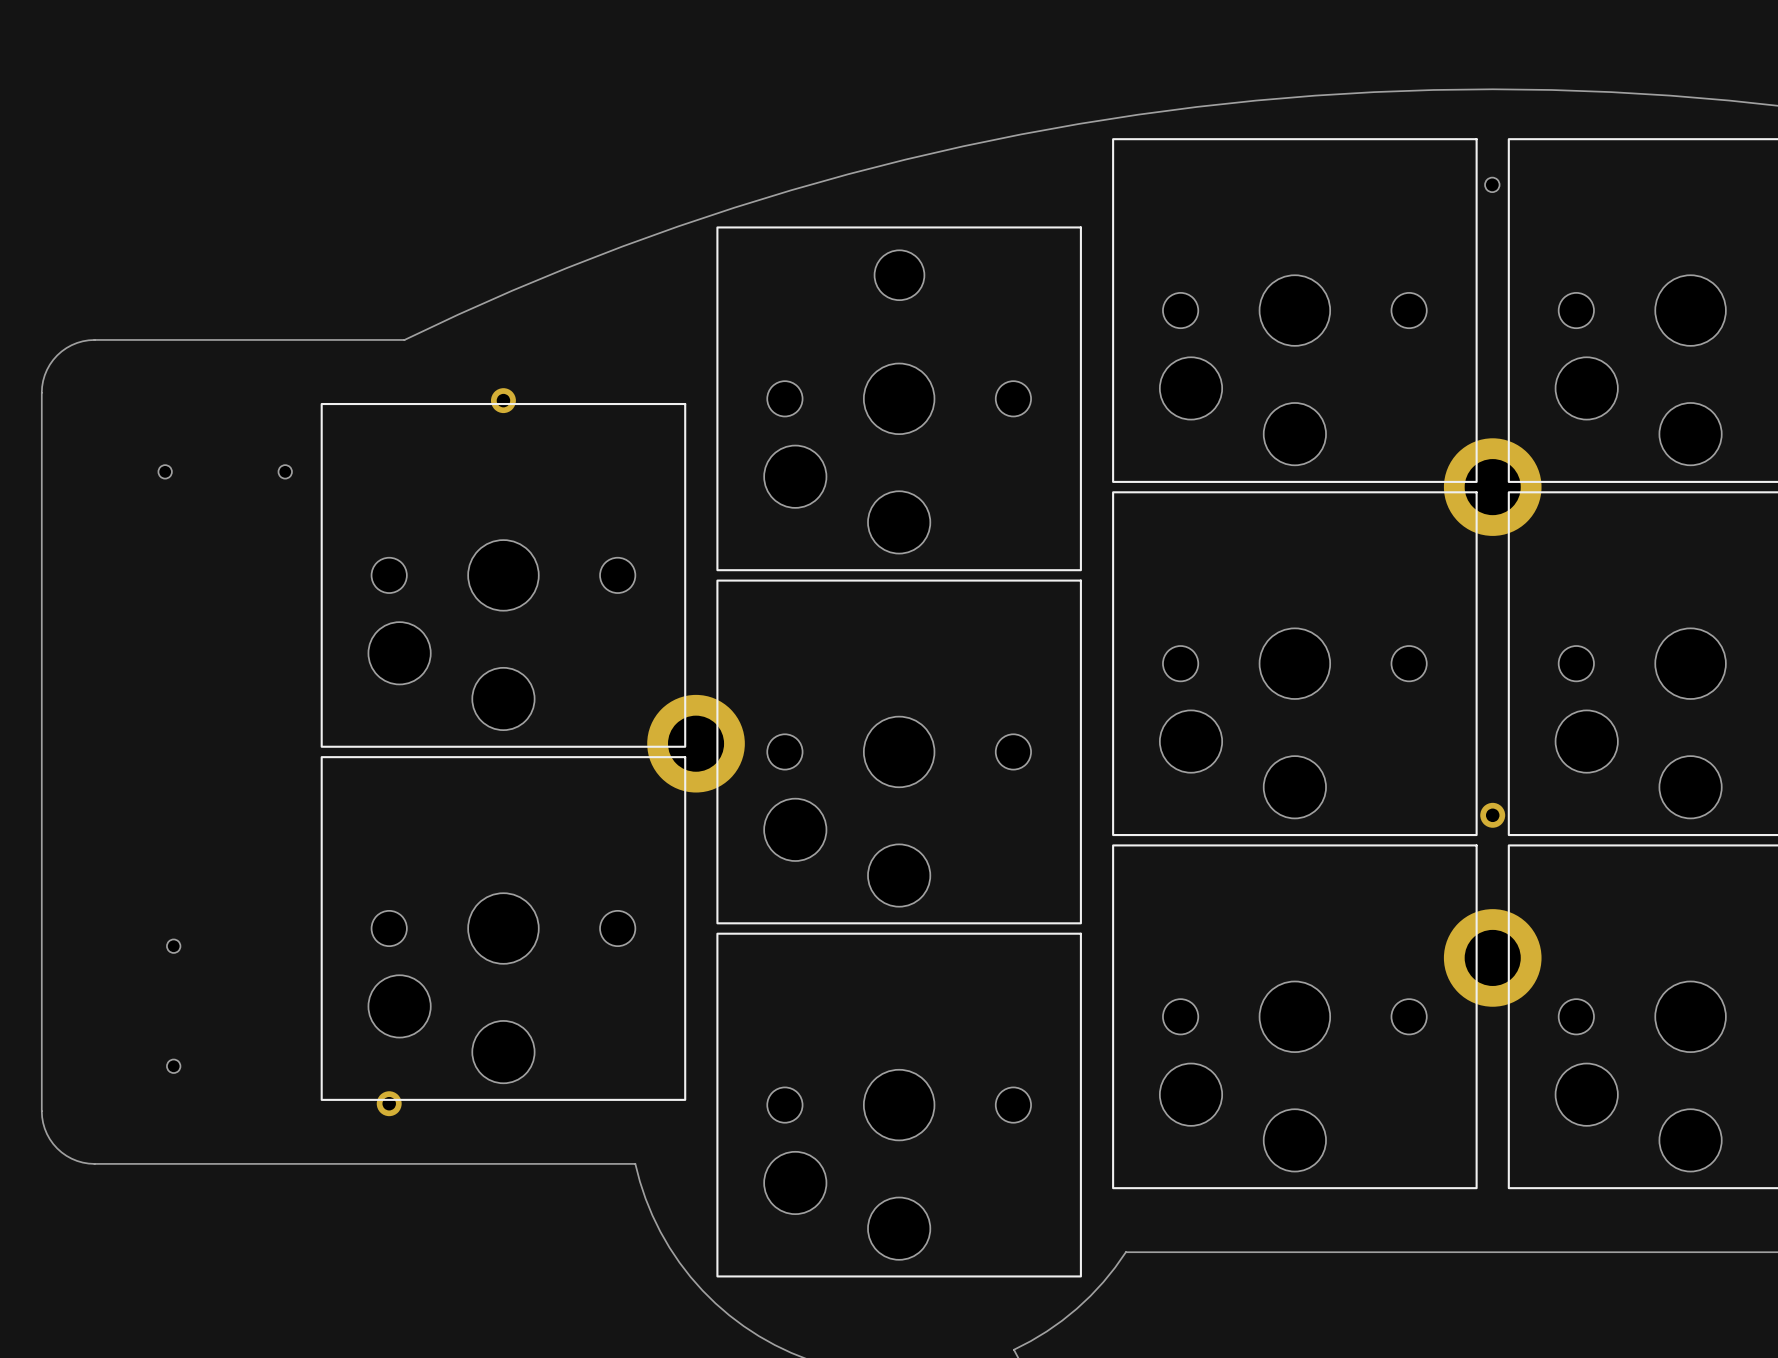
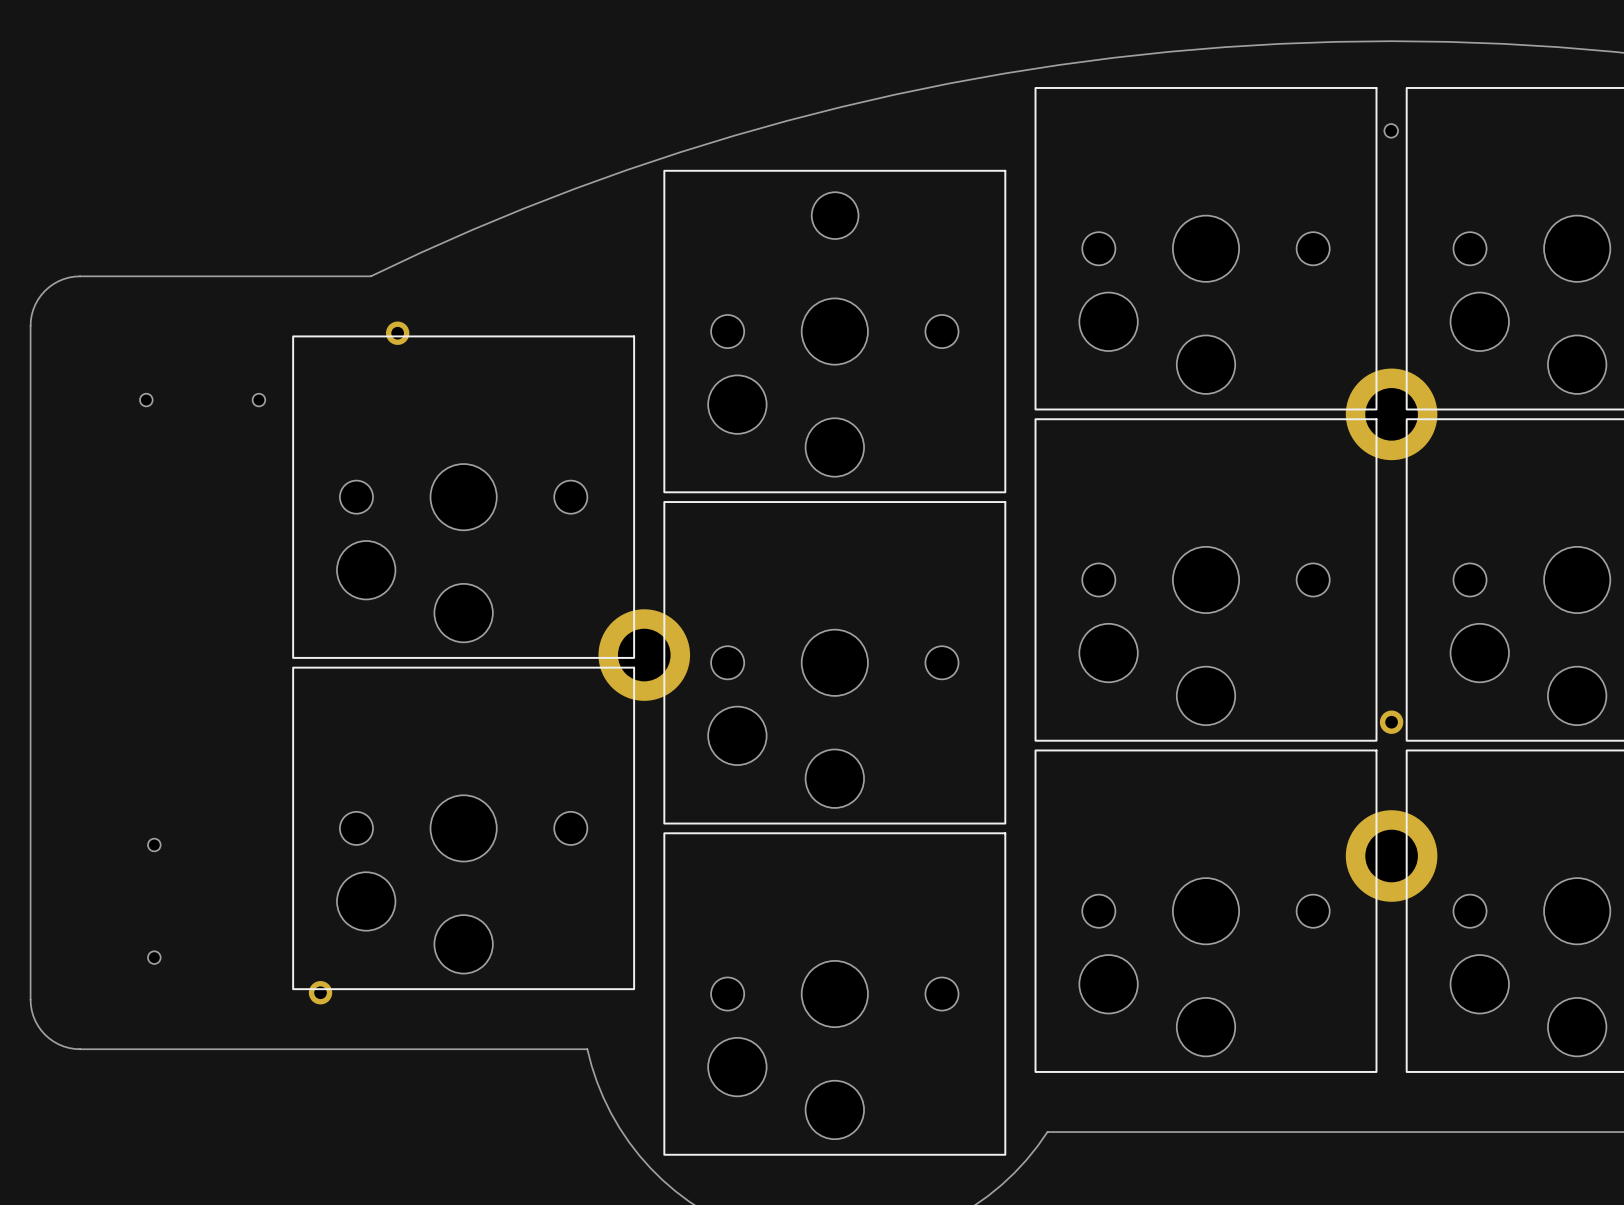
part position: (503, 400) -> (397, 333)
part position: (389, 1103) -> (320, 992)

